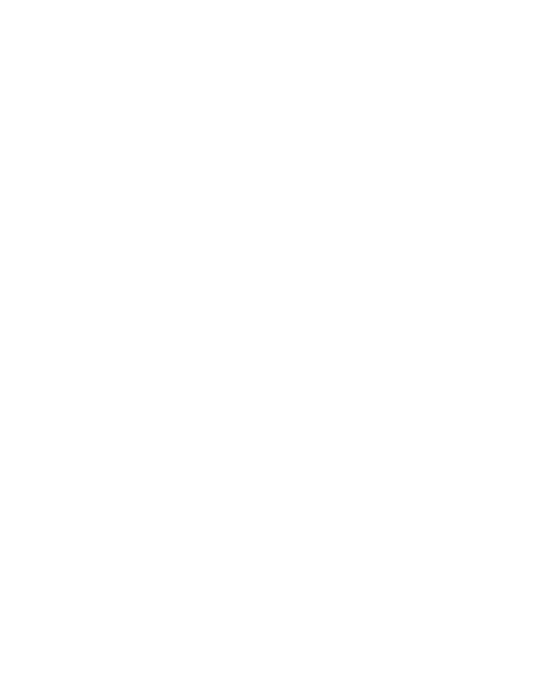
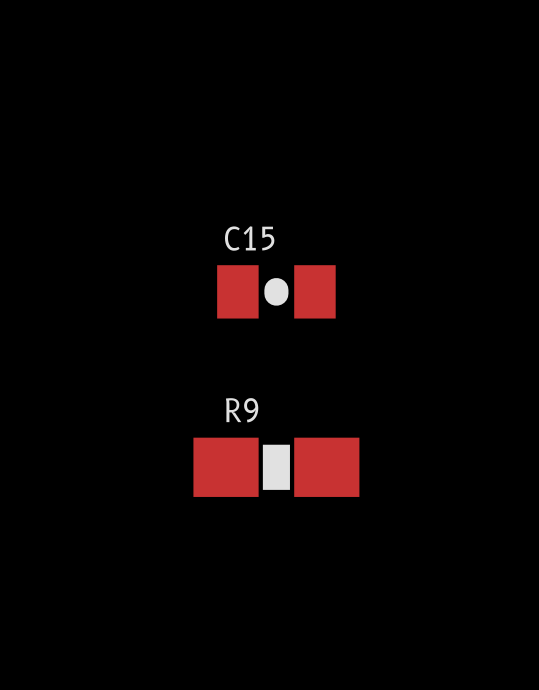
C15: none -> (276, 291)
R9: none -> (276, 467)

